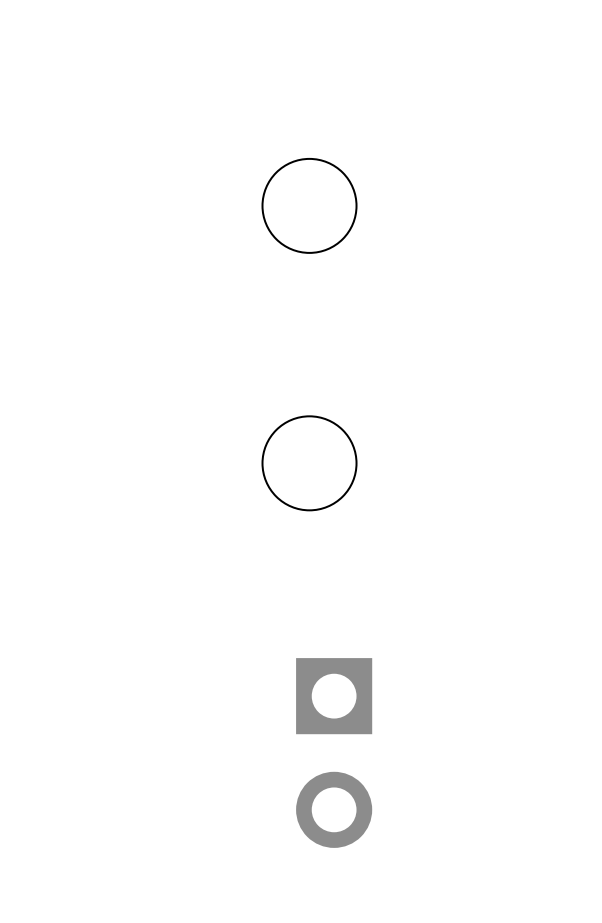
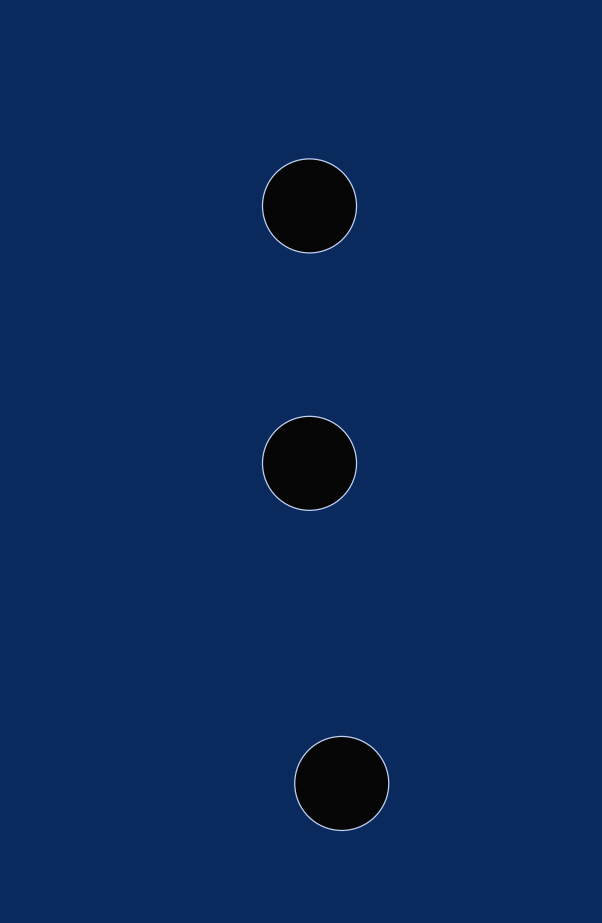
part footprint: [296, 658, 373, 848] -> [294, 736, 389, 831]

